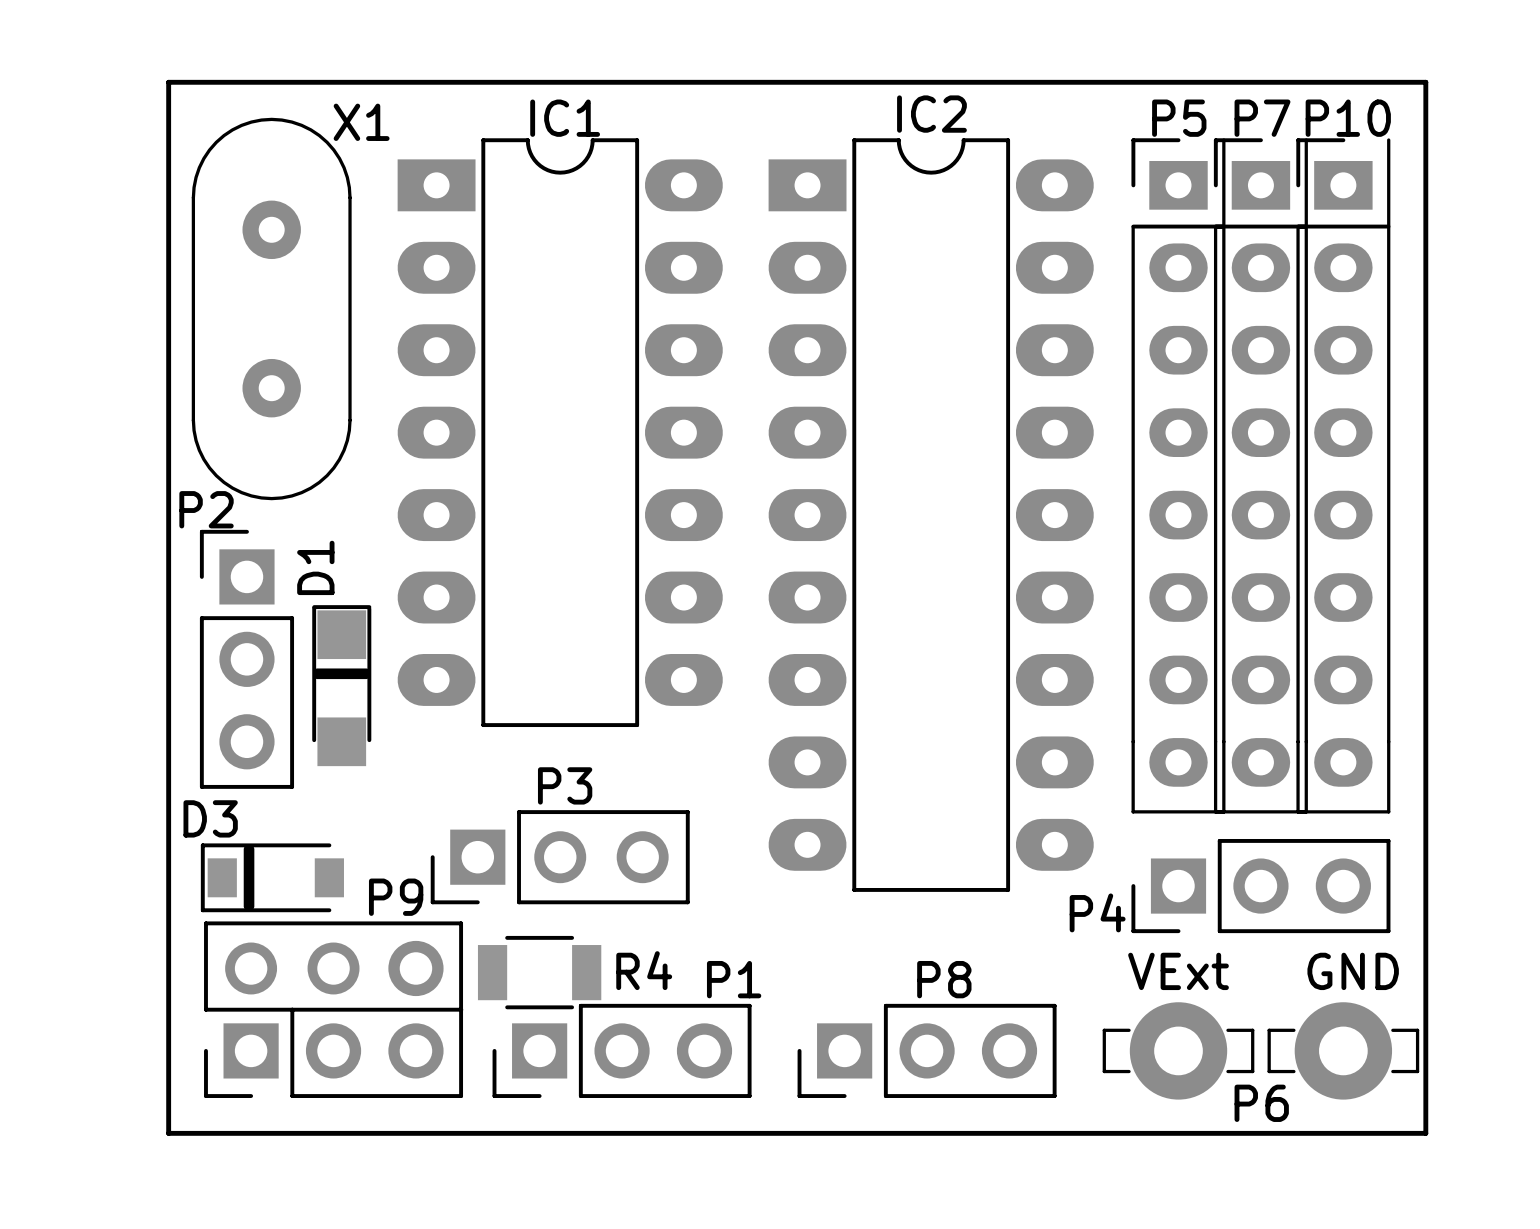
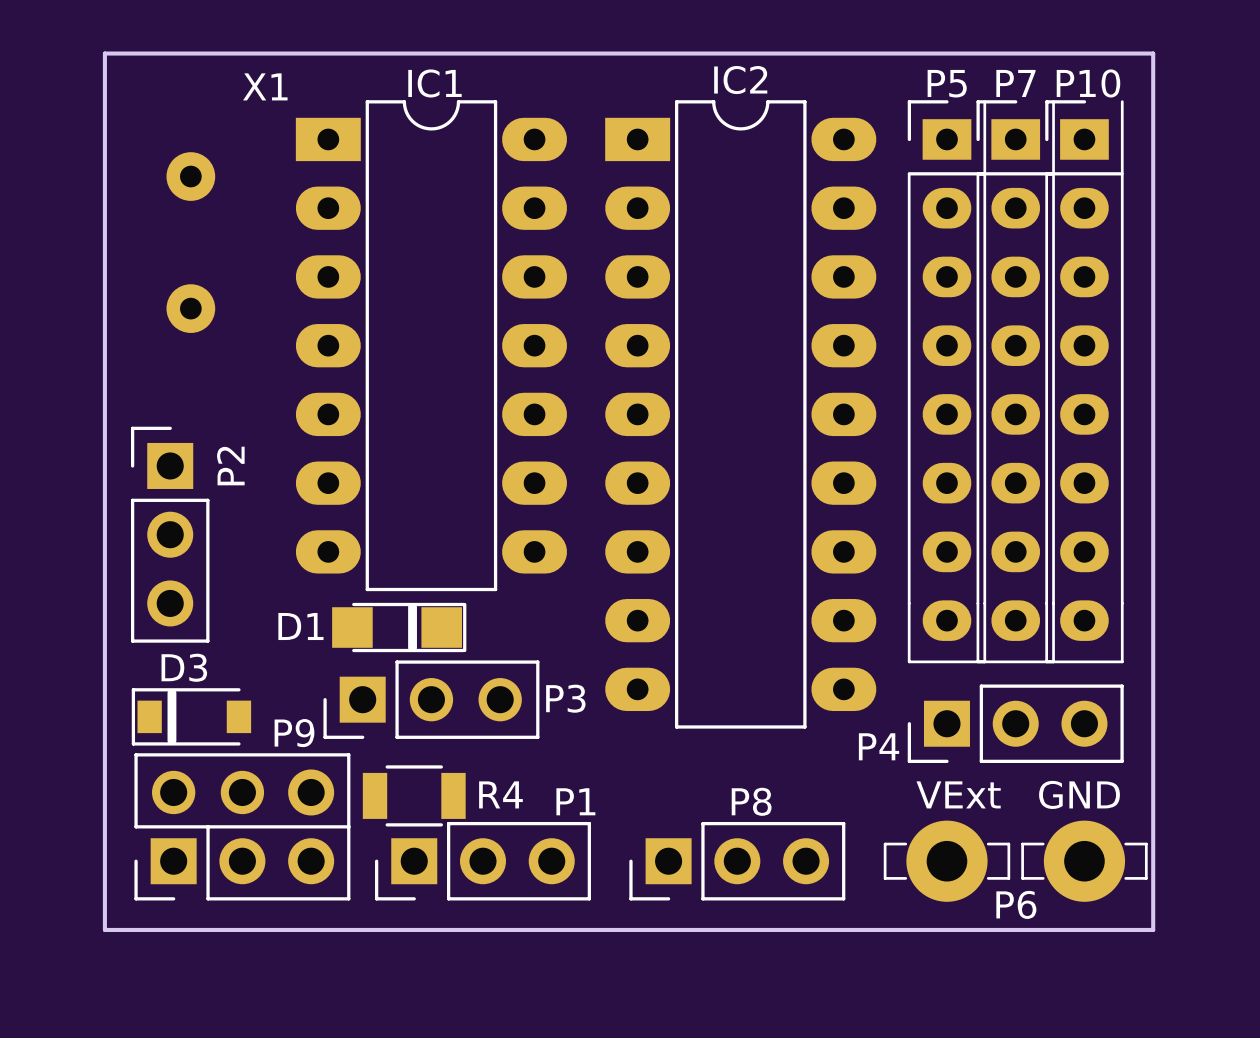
X1 footprint: [191, 117, 352, 501] -> [166, 152, 216, 333]
P2 name rotation: 0° (206, 509) -> 90° counterclockwise (230, 466)
P2 name position: P2 (206, 509) -> P2 (230, 466)
D1 name position: D1 (315, 567) -> D1 (300, 626)
line: (317, 671) (366, 671) -> none
line: (317, 675) (366, 675) -> none
D1 rotation: 0° (341, 685) -> 90° clockwise (399, 627)
D1 position: (341, 685) -> (399, 627)
line: none -> (410, 606) (410, 648)
line: none -> (414, 606) (414, 648)
P3 name position: P3 (565, 785) -> P3 (565, 698)
D3 name position: D3 (210, 818) -> D3 (184, 667)

